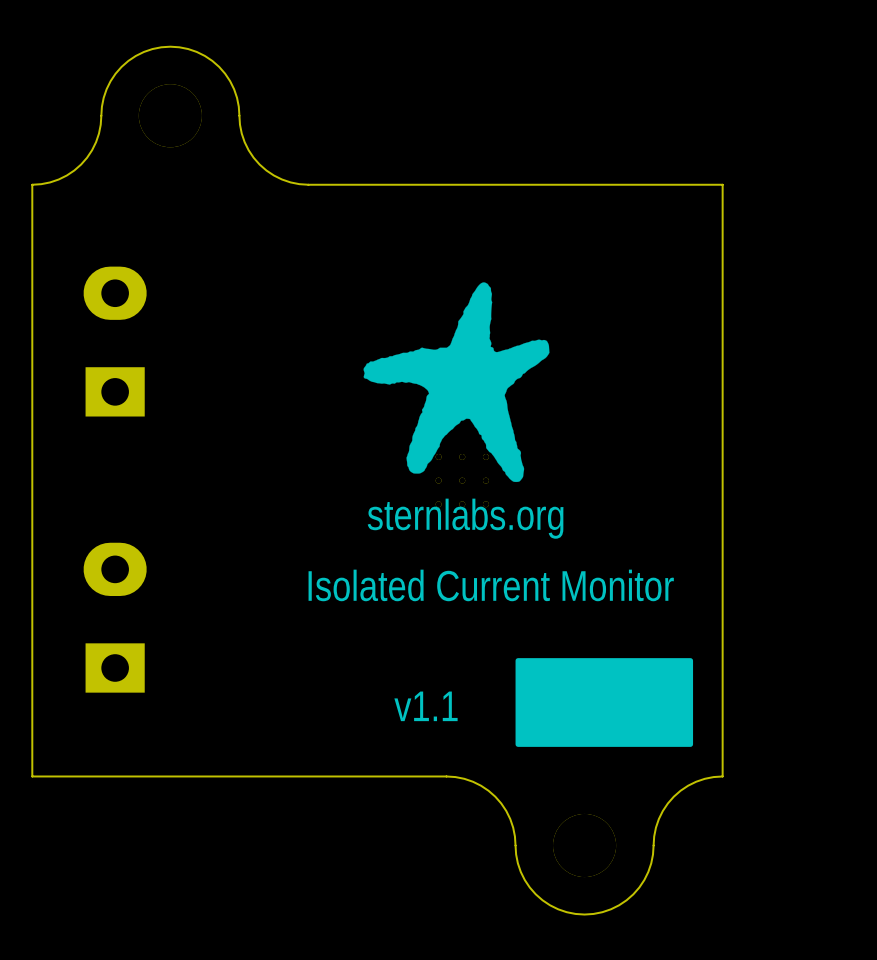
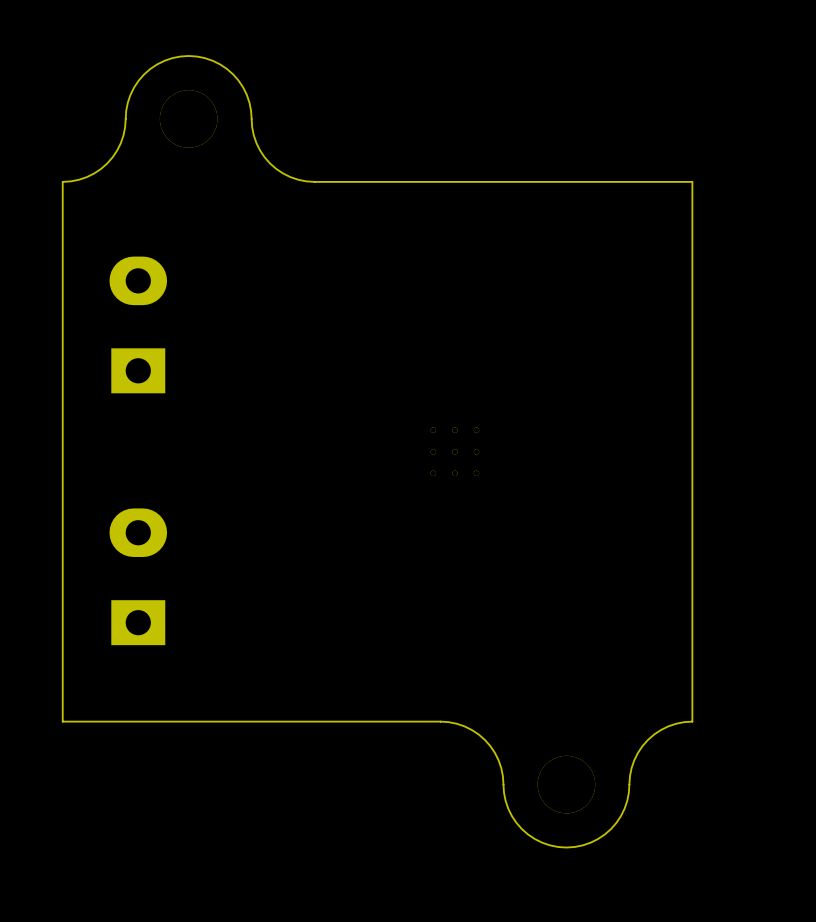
drawing: [363, 282, 550, 483] -> none
text: sternlabs.org (465, 518) -> none
text: Isolated Current Monitor (491, 585) -> none
drawing: [515, 658, 694, 747] -> none
text: v1.1 (426, 706) -> none

